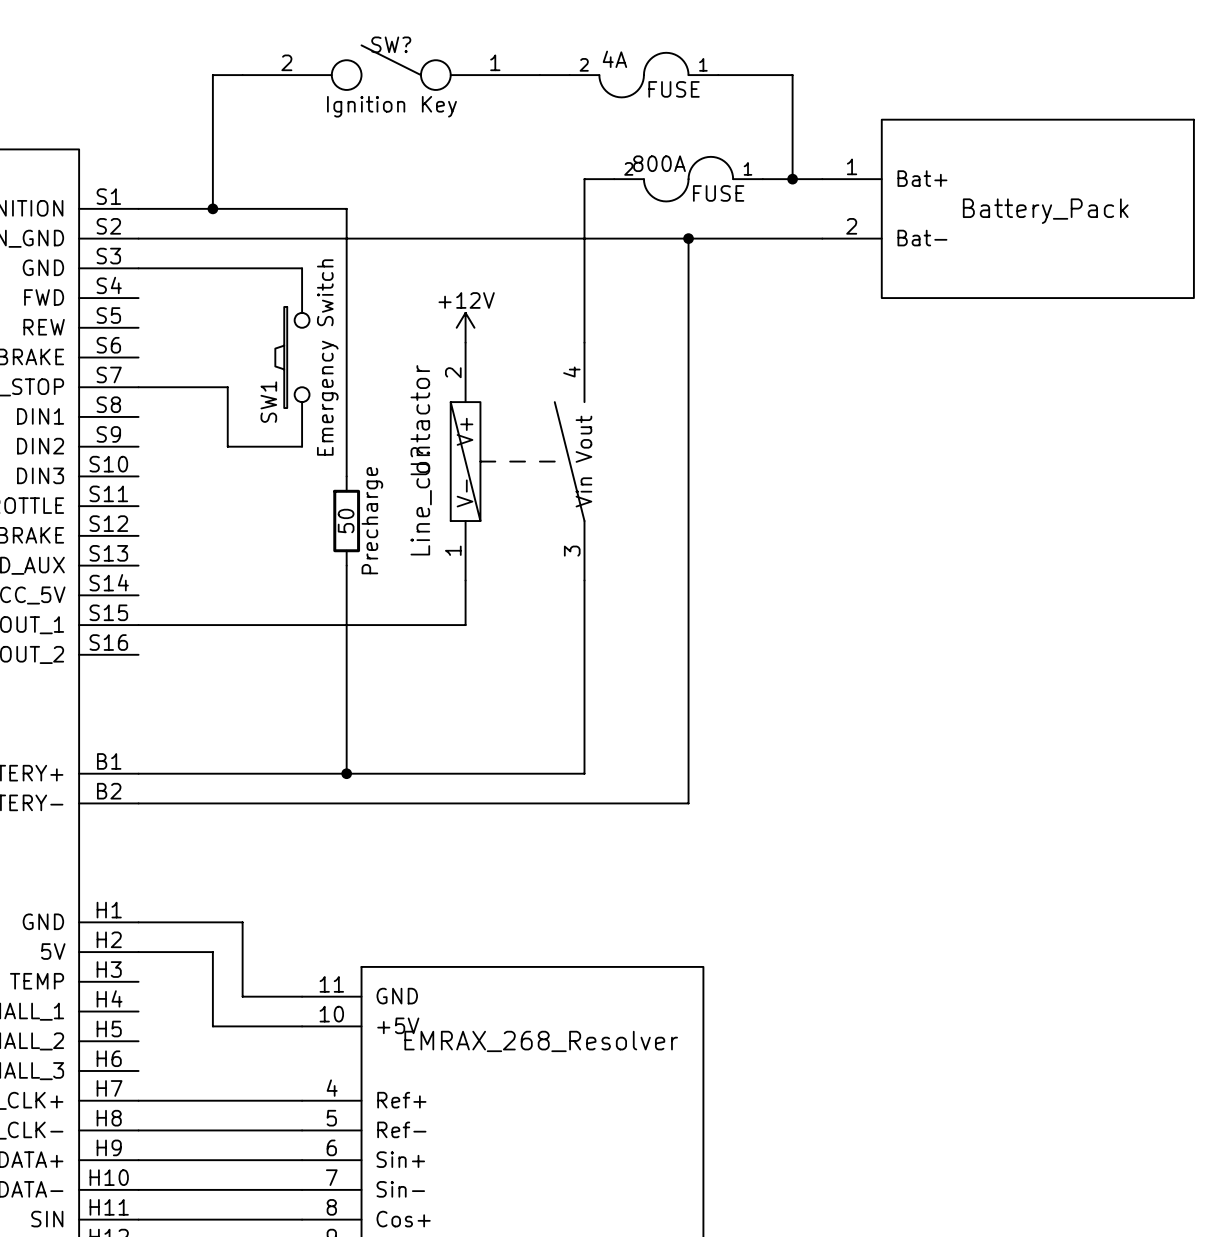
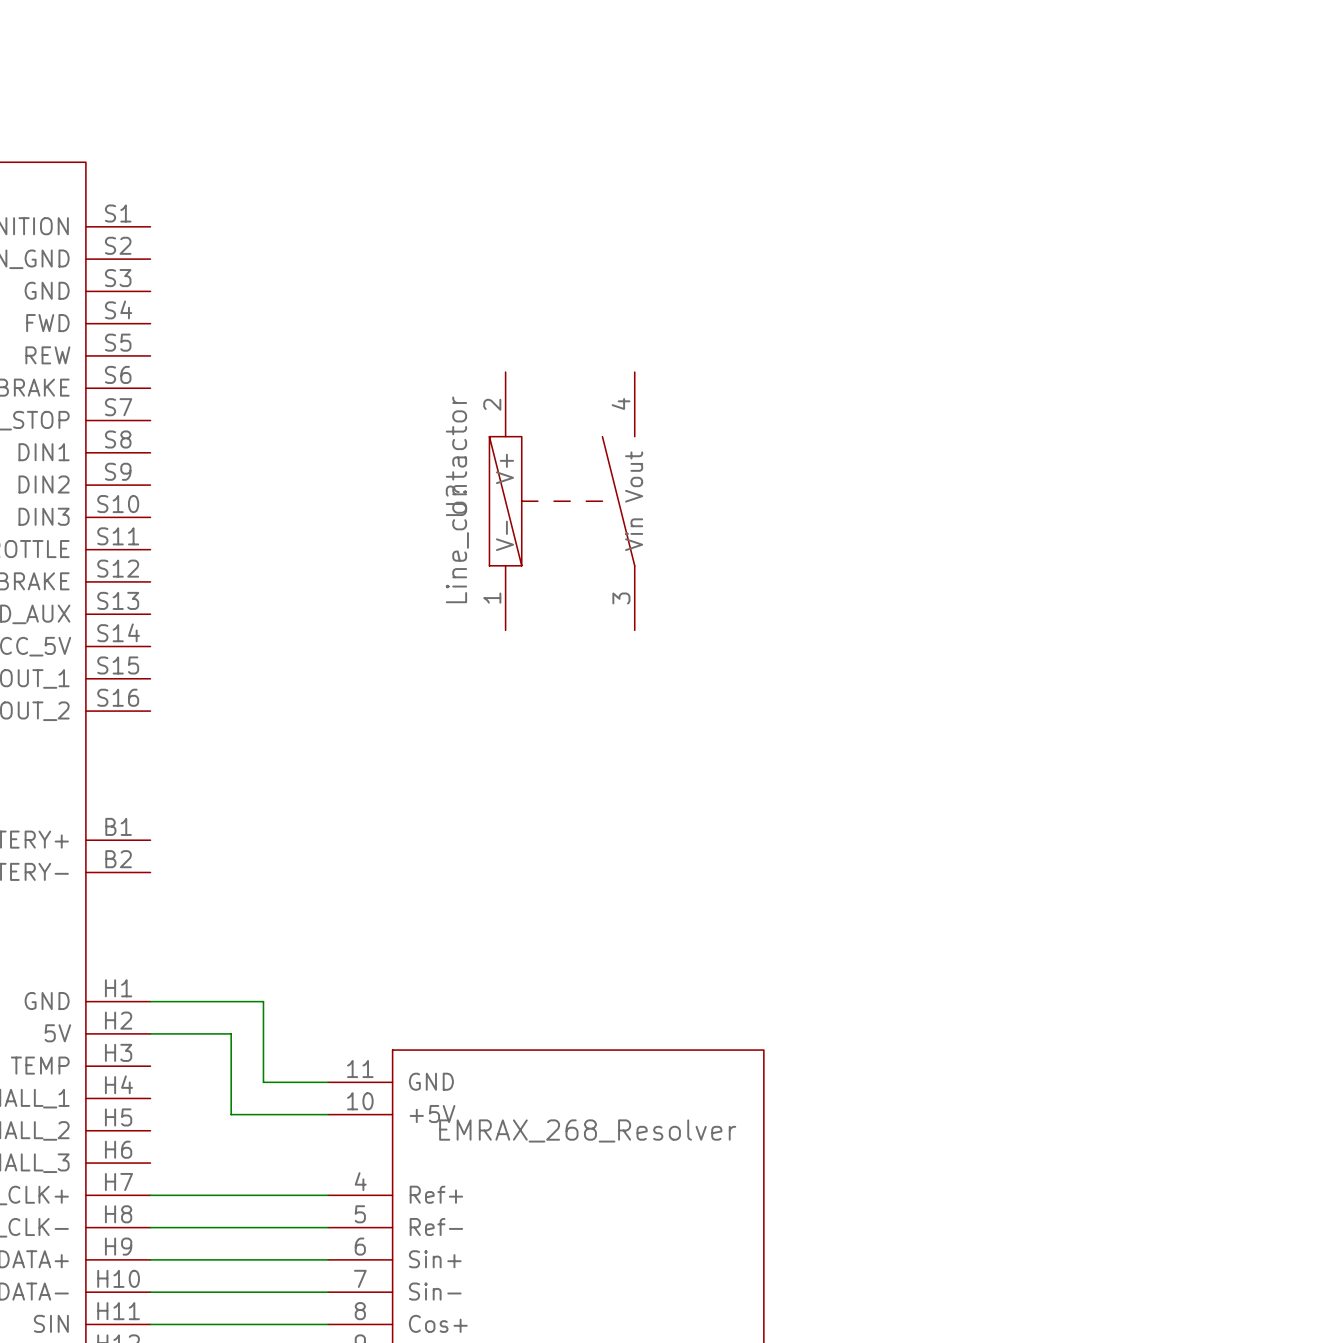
SW?: Ignition Key (391, 67) -> none
wire: (242, 75) (212, 75) (212, 208) -> none
wire: (539, 75) (569, 75) -> none
4A: FUSE (643, 75) -> none
wire: (718, 75) (792, 75) (792, 179) -> none
wire: (614, 179) (584, 179) (584, 342) -> none
800A: FUSE (688, 179) -> none
wire: (762, 179) (822, 179) -> none
junction: (792, 179) -> none
wire: (138, 208) (346, 208) (346, 476) -> none
junction: (212, 208) -> none
part: Battery_Pack (1008, 208) -> none
wire: (138, 238) (822, 238) -> none
wire: (688, 238) (688, 803) (138, 803) -> none
junction: (688, 238) -> none
wire: (138, 268) (302, 268) -> none
power symbol: +12V (465, 327) -> none
SW1: Emergency Switch (292, 357) -> none
wire: (138, 387) (227, 387) (227, 446) (302, 446) -> none
Precharge: 50 (346, 521) -> none
wire: (346, 565) (346, 773) -> none
wire: (465, 580) (465, 625) (138, 625) -> none
wire: (584, 580) (584, 773) (138, 773) -> none
junction: (346, 773) -> none

